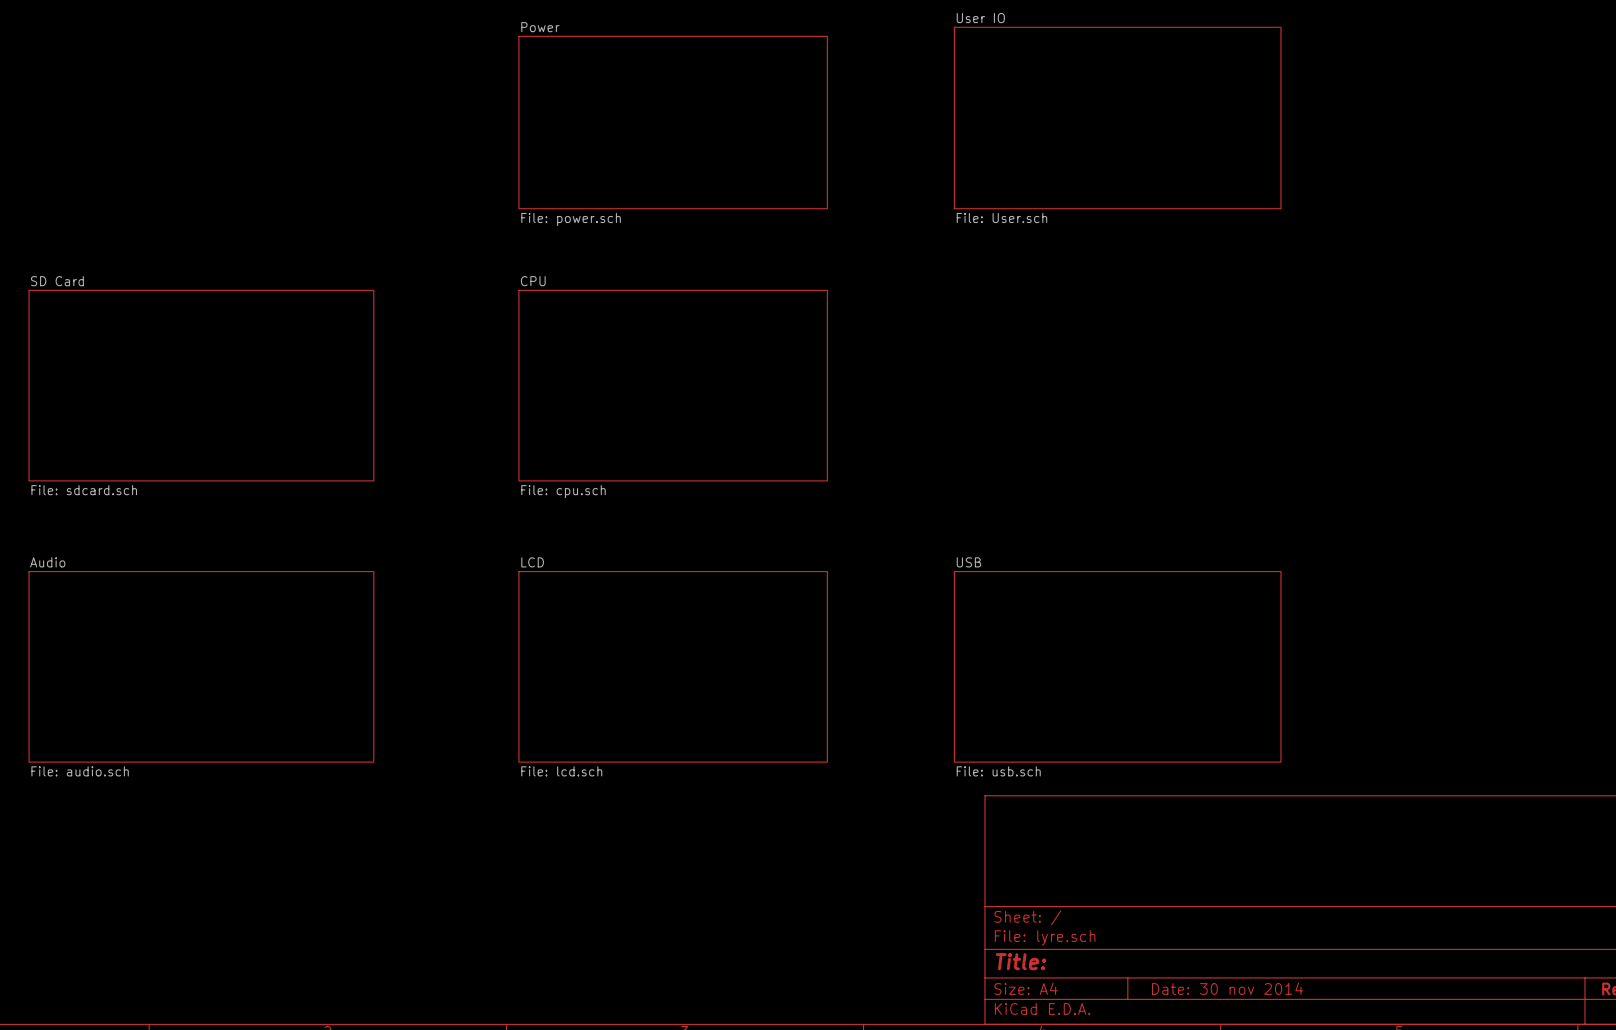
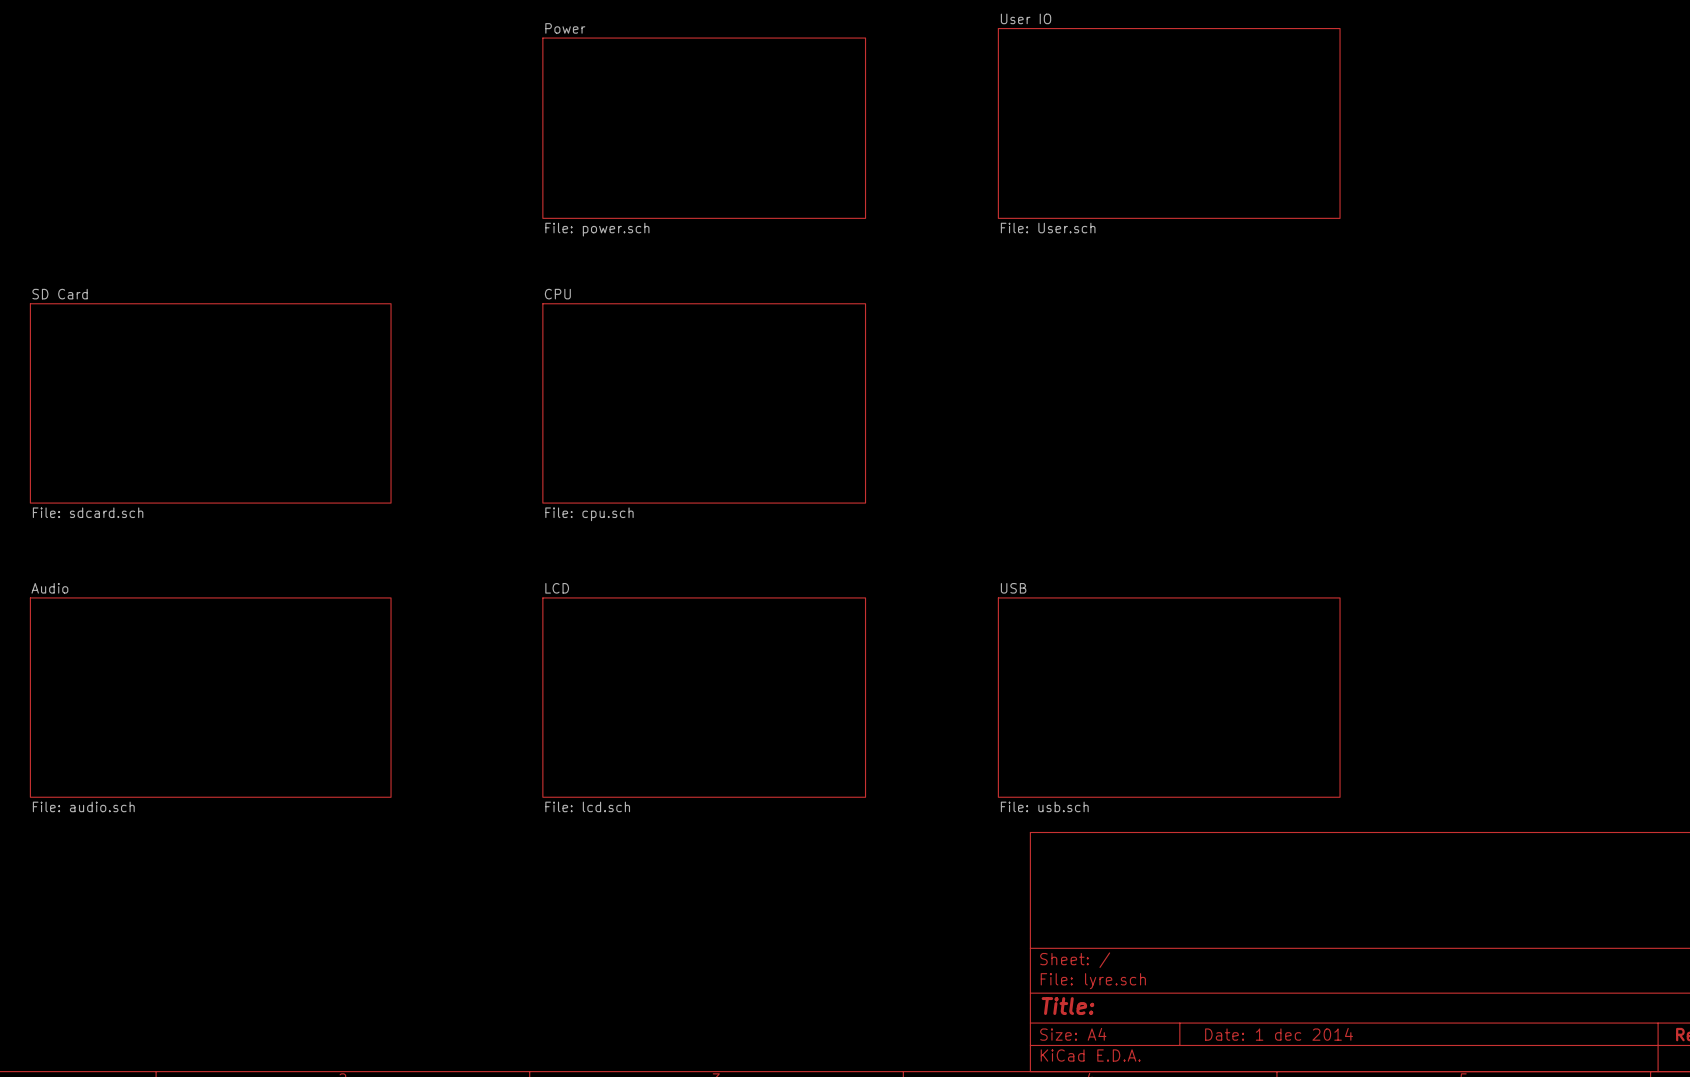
title block: Date: 30 nov 2014 (1227, 988) -> Date: 1 dec 2014 (1279, 1034)

